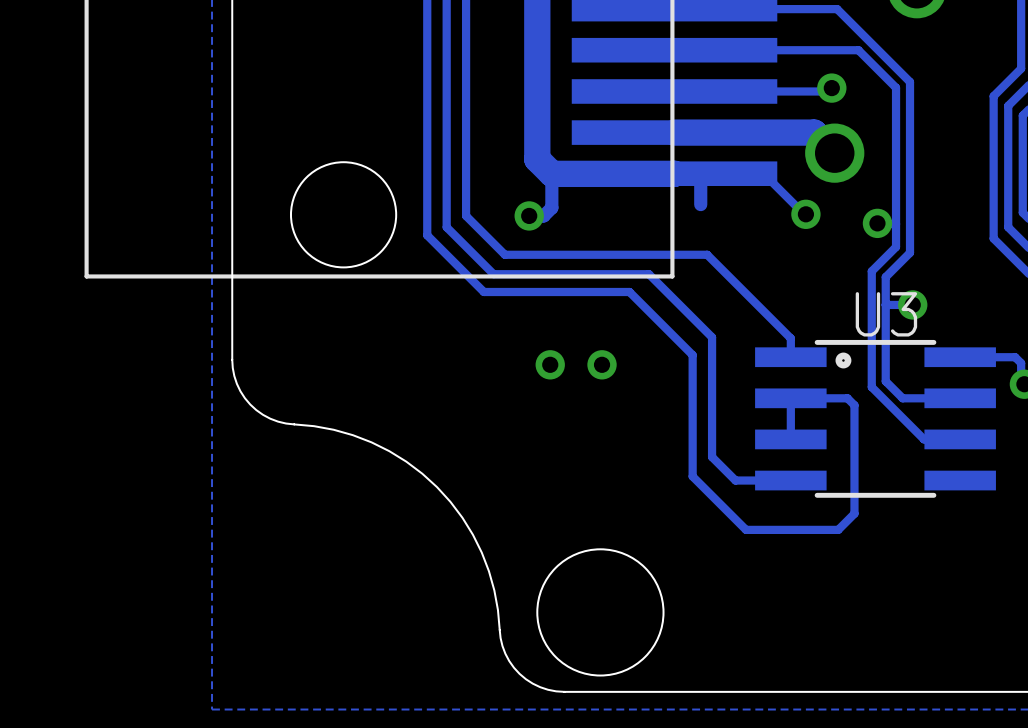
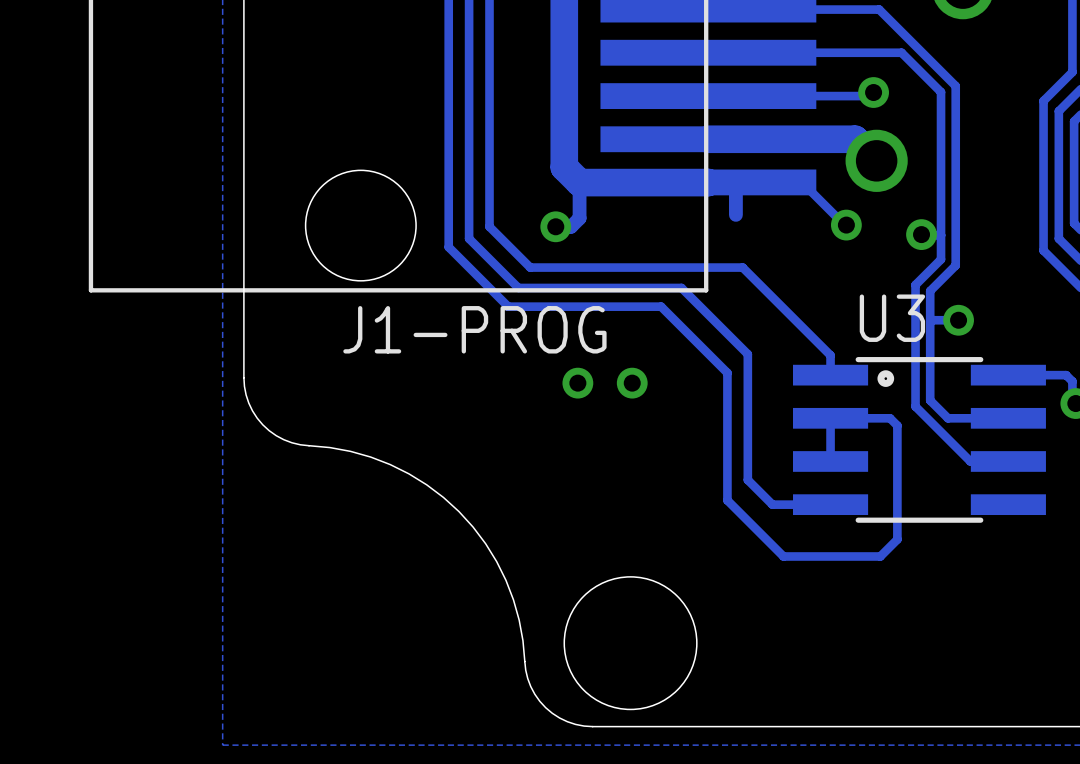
J1-PROG name: none -> J1-PROG (474, 329)
U3 name position: U3 (886, 314) -> U3 (892, 318)

